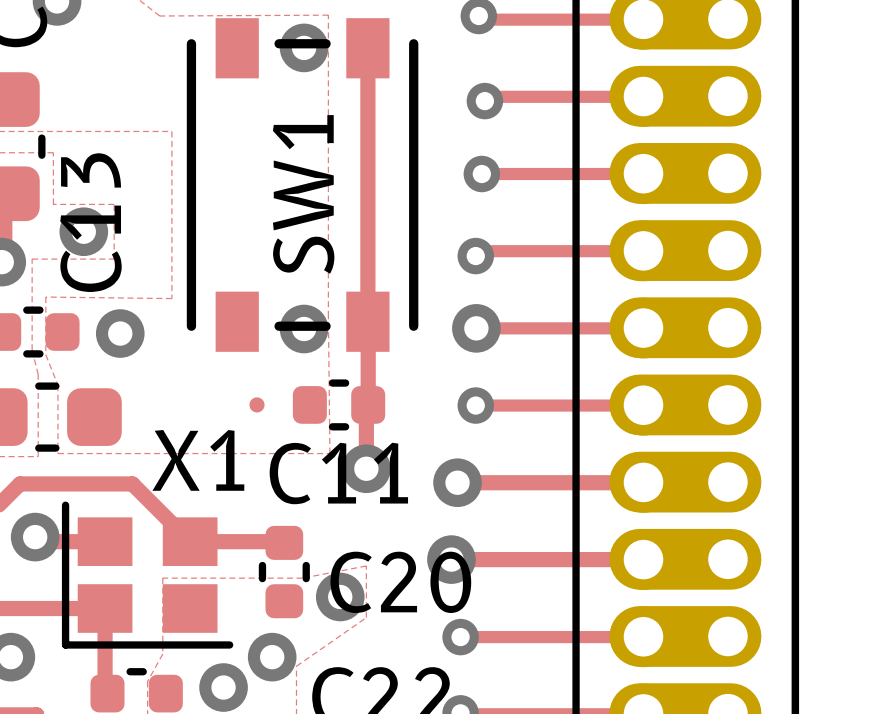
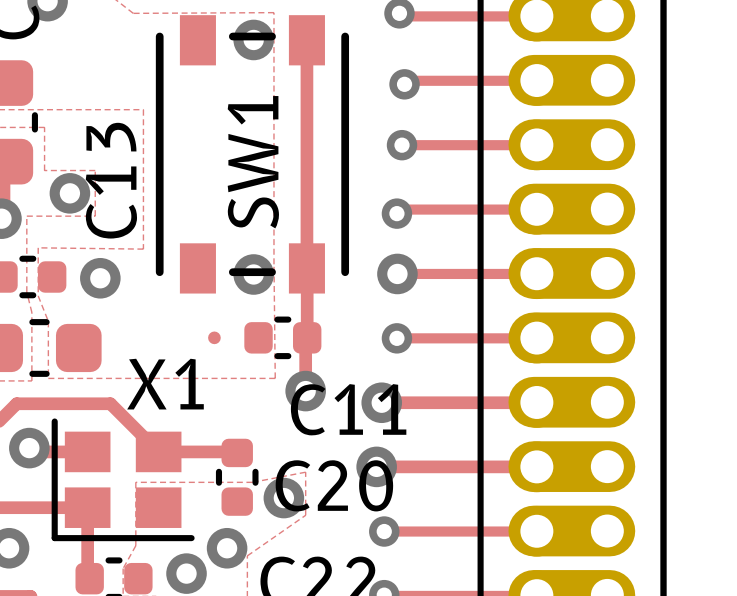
C13 name position: C13 (90, 222) -> C13 (111, 180)
C11 name position: C11 (338, 473) -> C11 (348, 409)

